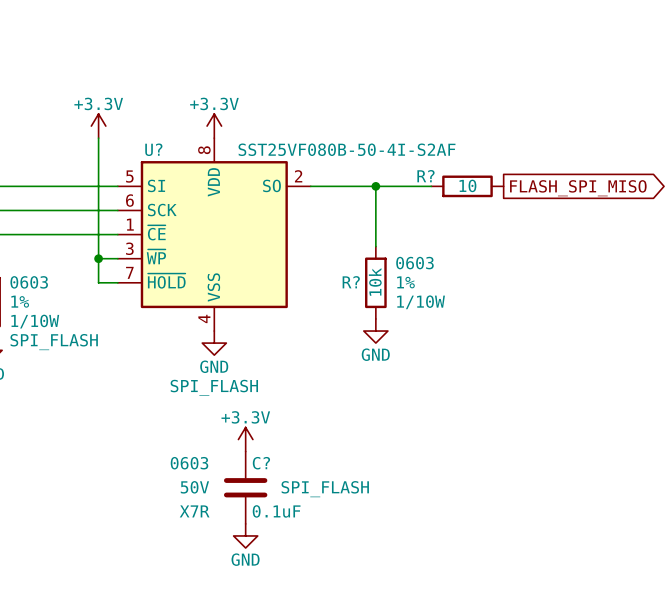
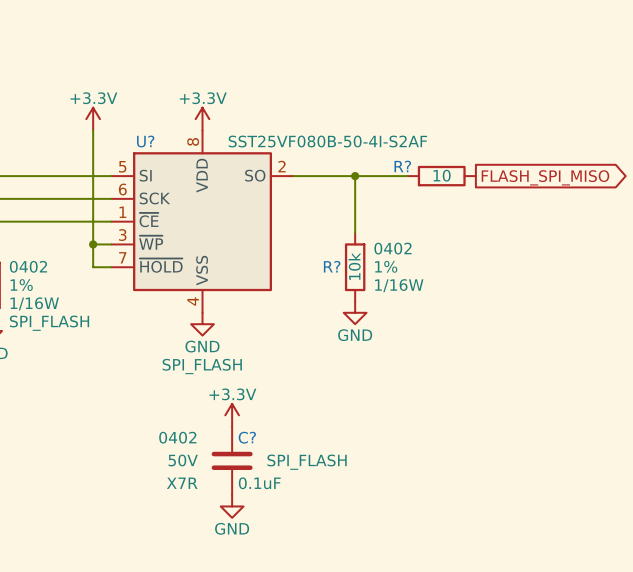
R? text: 0603 (414, 263) -> 0402 (393, 248)
part text: 0603 (29, 282) -> 0402 (28, 266)
R? text: 1/10W (421, 302) -> 1/16W (399, 285)
part text: 1/10W (35, 321) -> 1/16W (34, 303)
C? text: 0603 (189, 463) -> 0402 (177, 437)

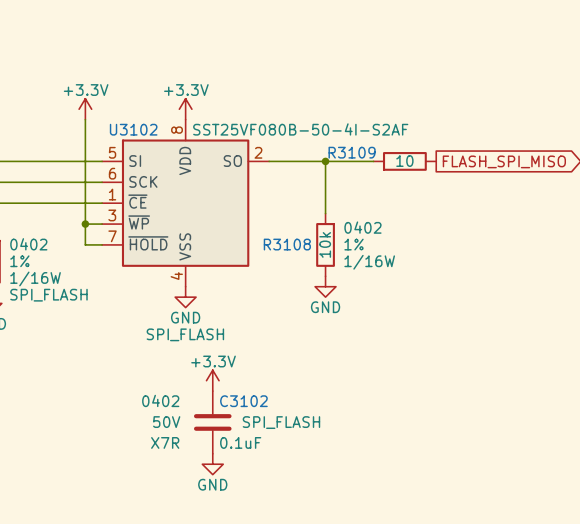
U? name: U? (145, 141) -> U3102 (133, 129)
R? name: R? (402, 166) -> R3109 (352, 152)
R? name: R? (332, 266) -> R3108 (287, 244)
C? name: C? (247, 437) -> C3102 (243, 401)

